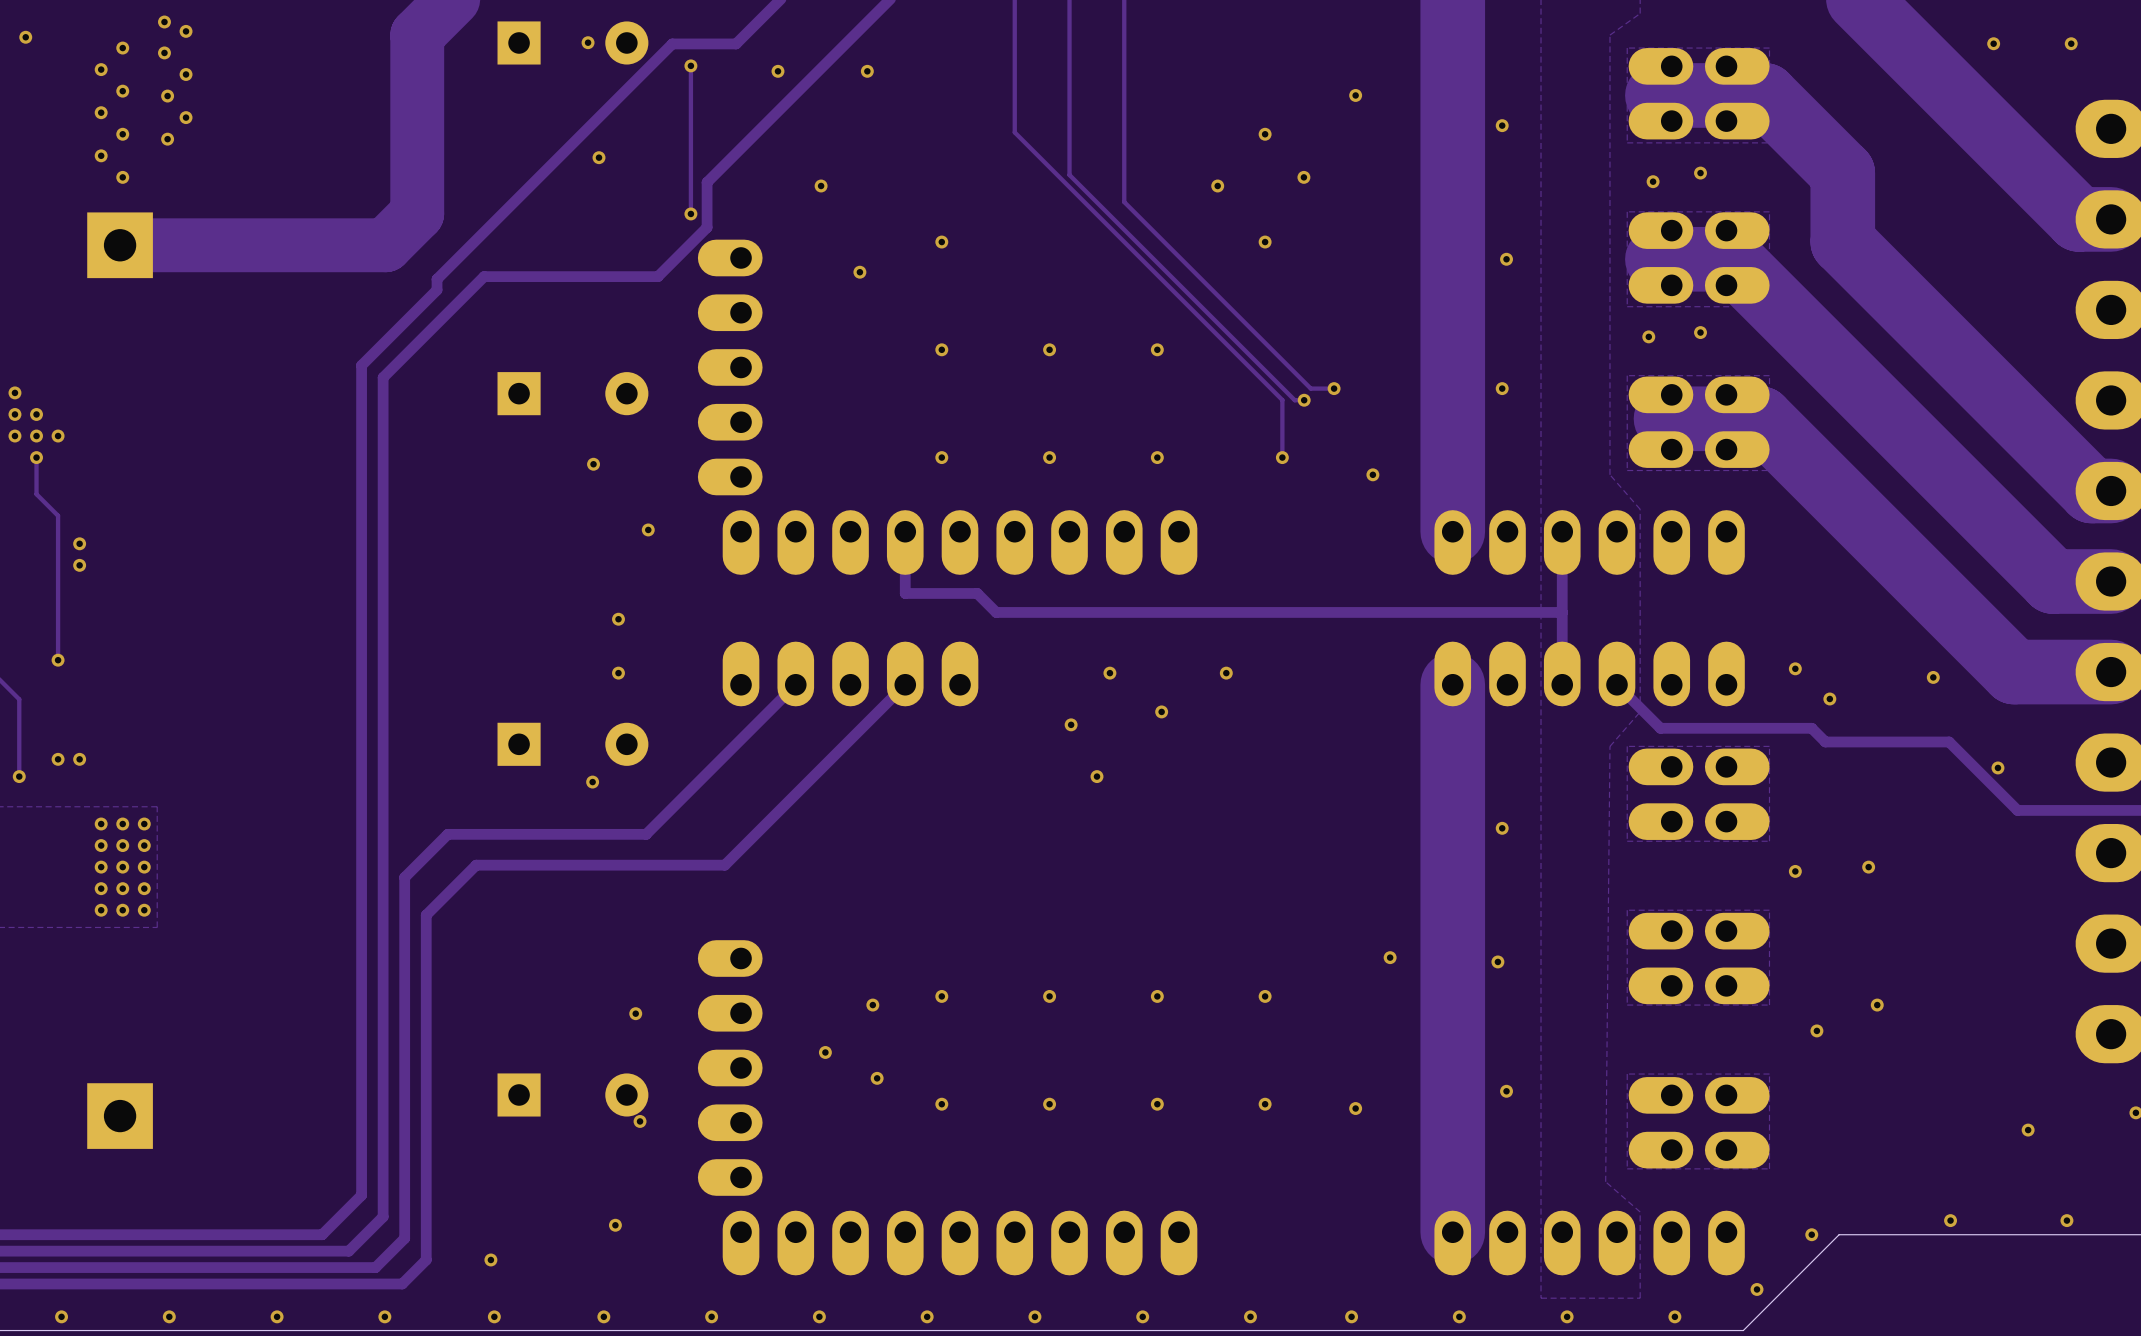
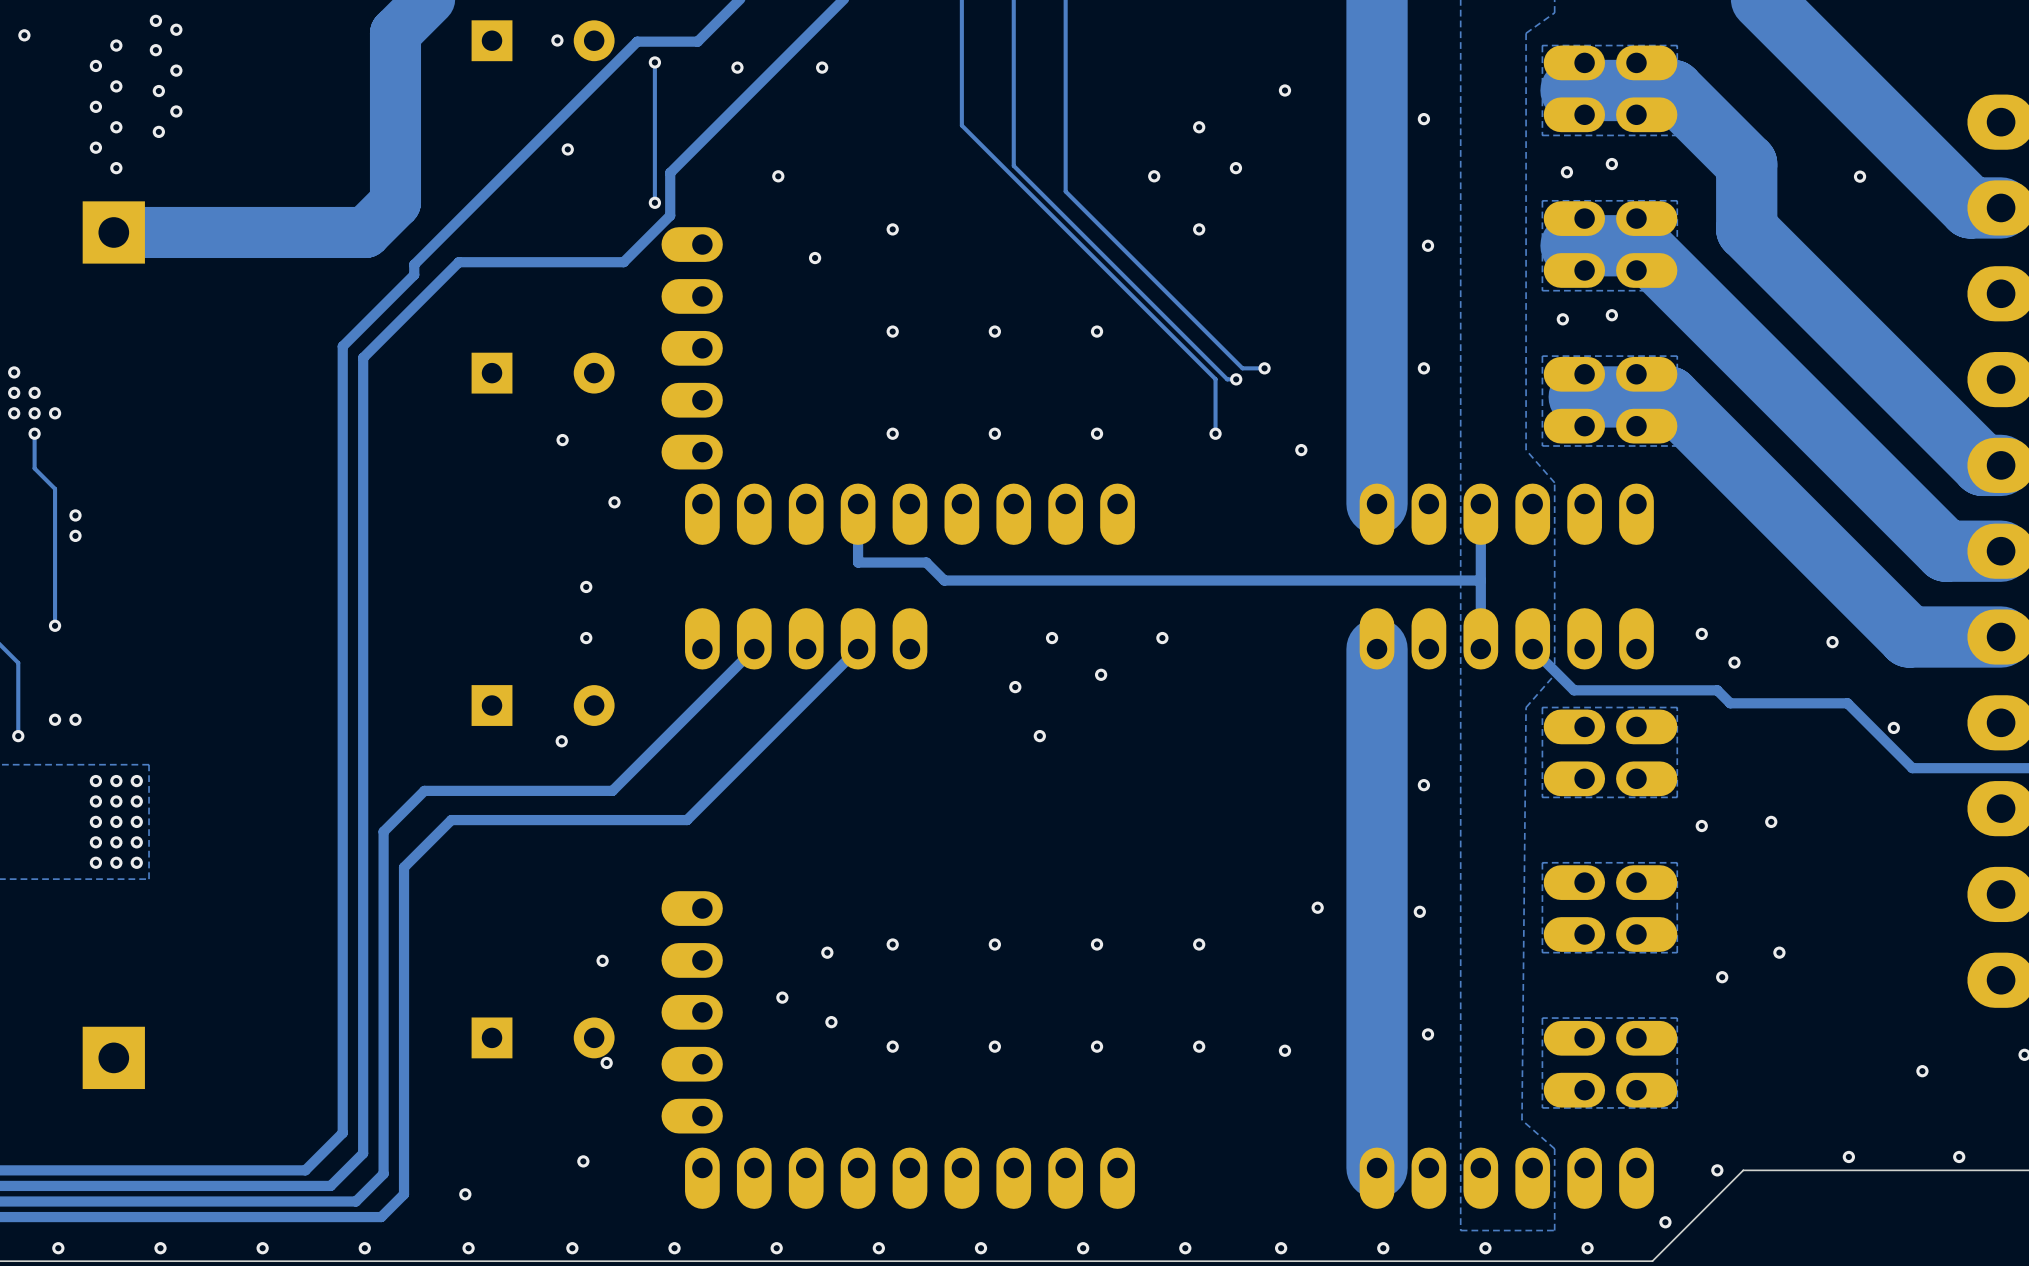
via: (1993, 43) -> none
via: (2071, 43) -> none
via: none -> (1860, 176)

